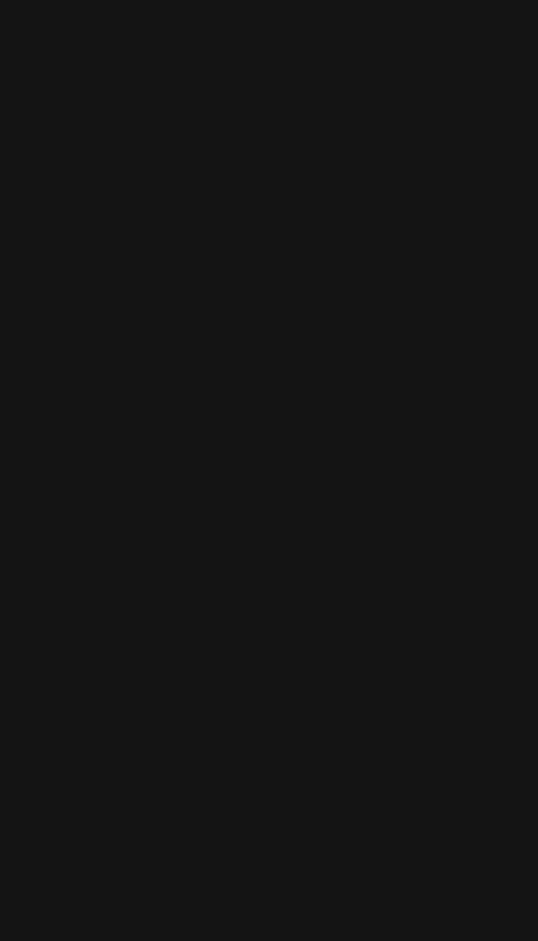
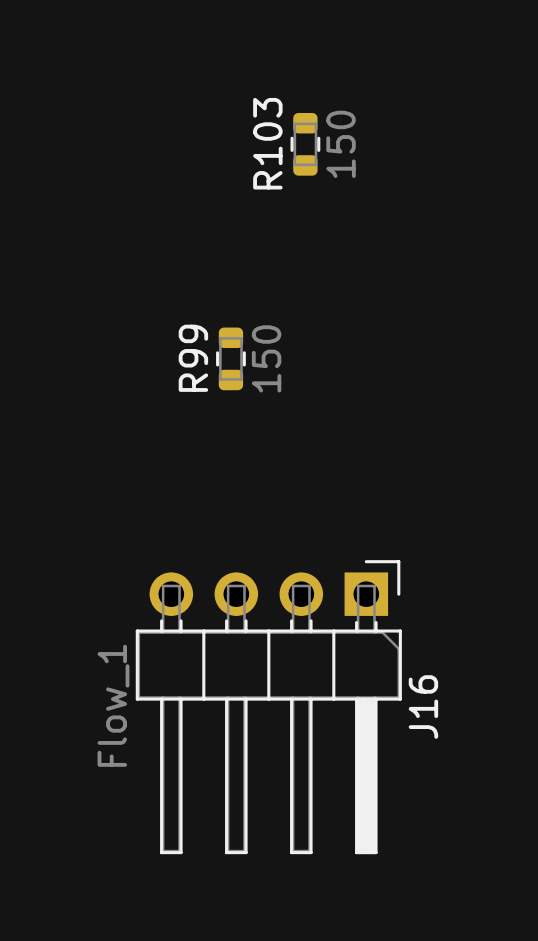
R103: none -> 150 (305, 144)
R99: none -> 150 (230, 358)
J16: none -> Flow_1 (268, 707)

